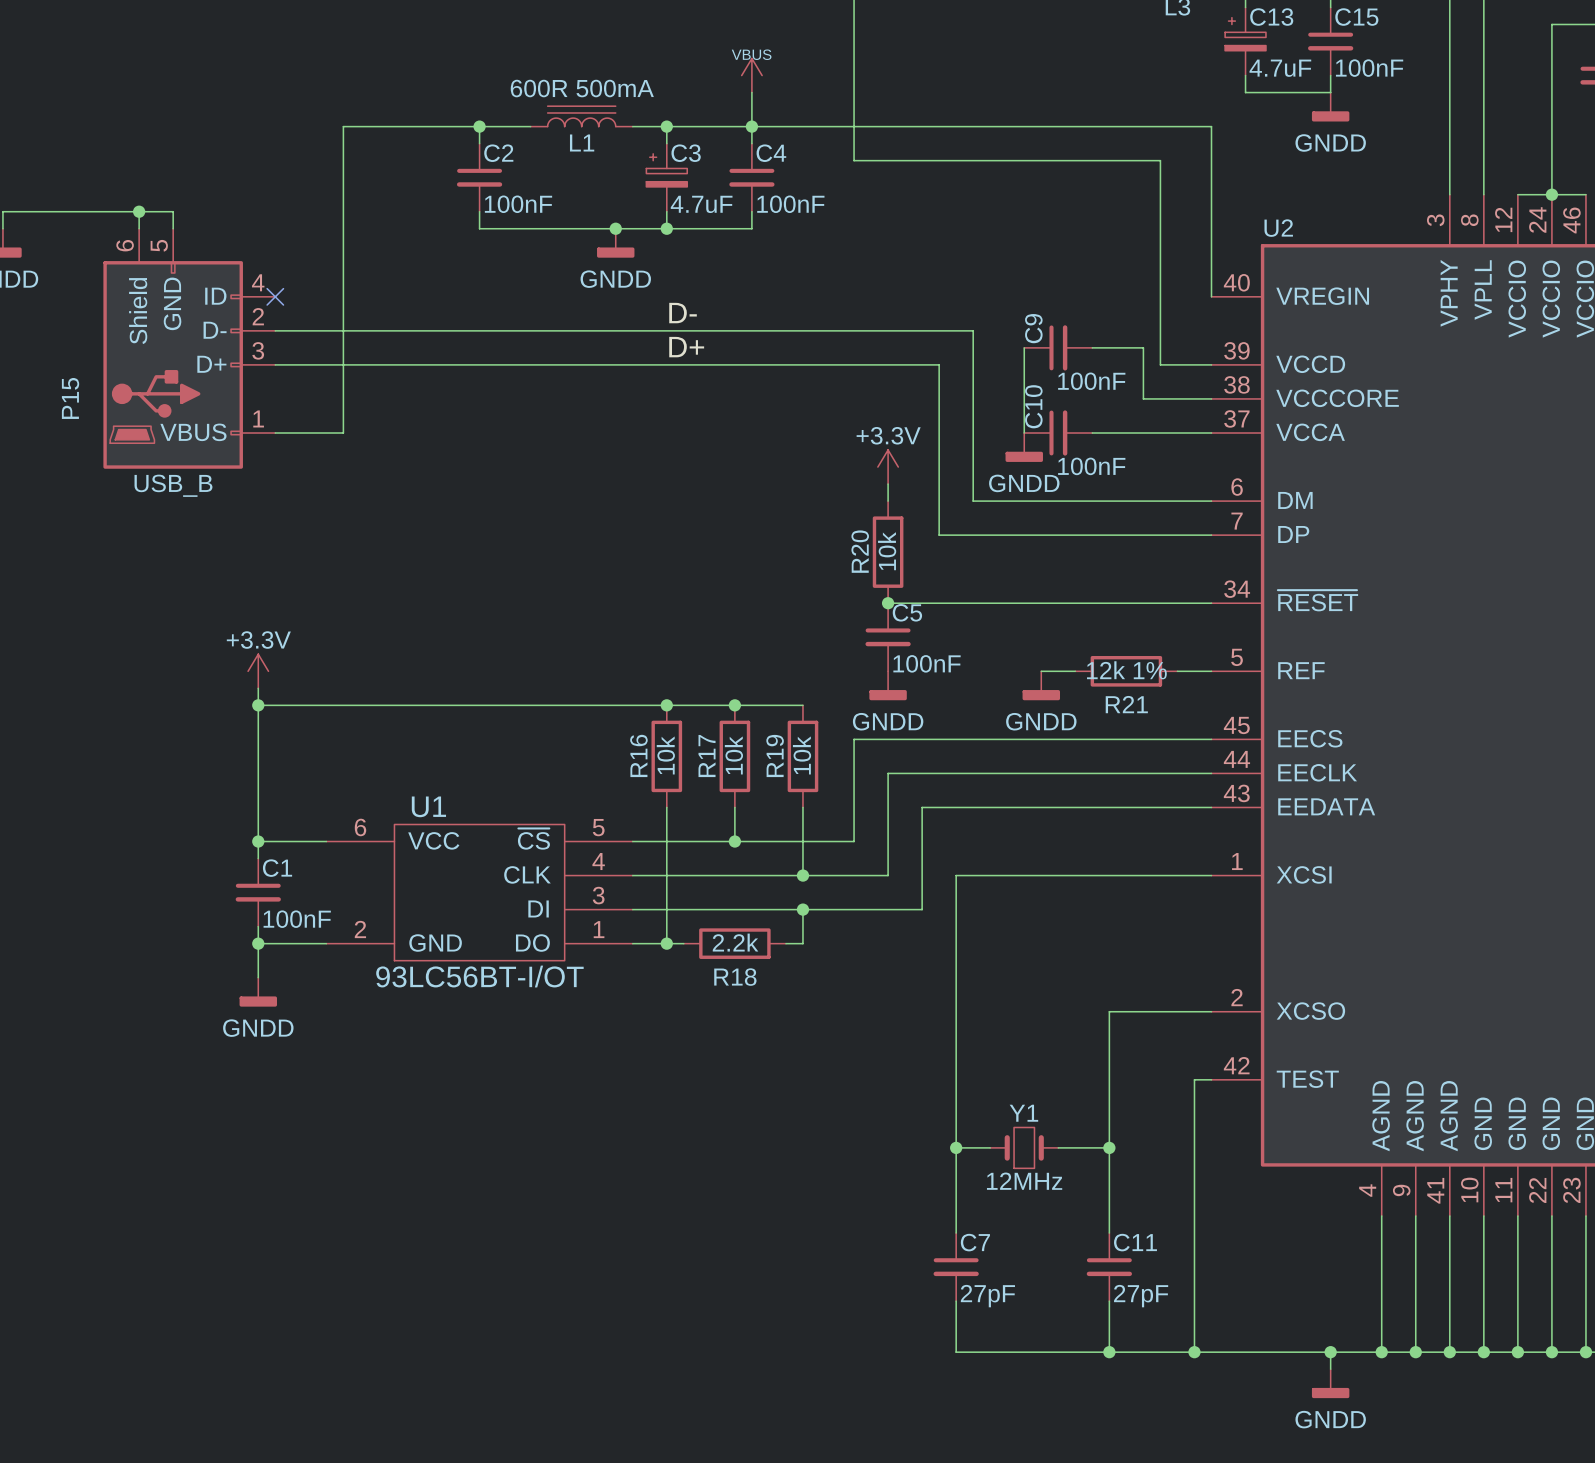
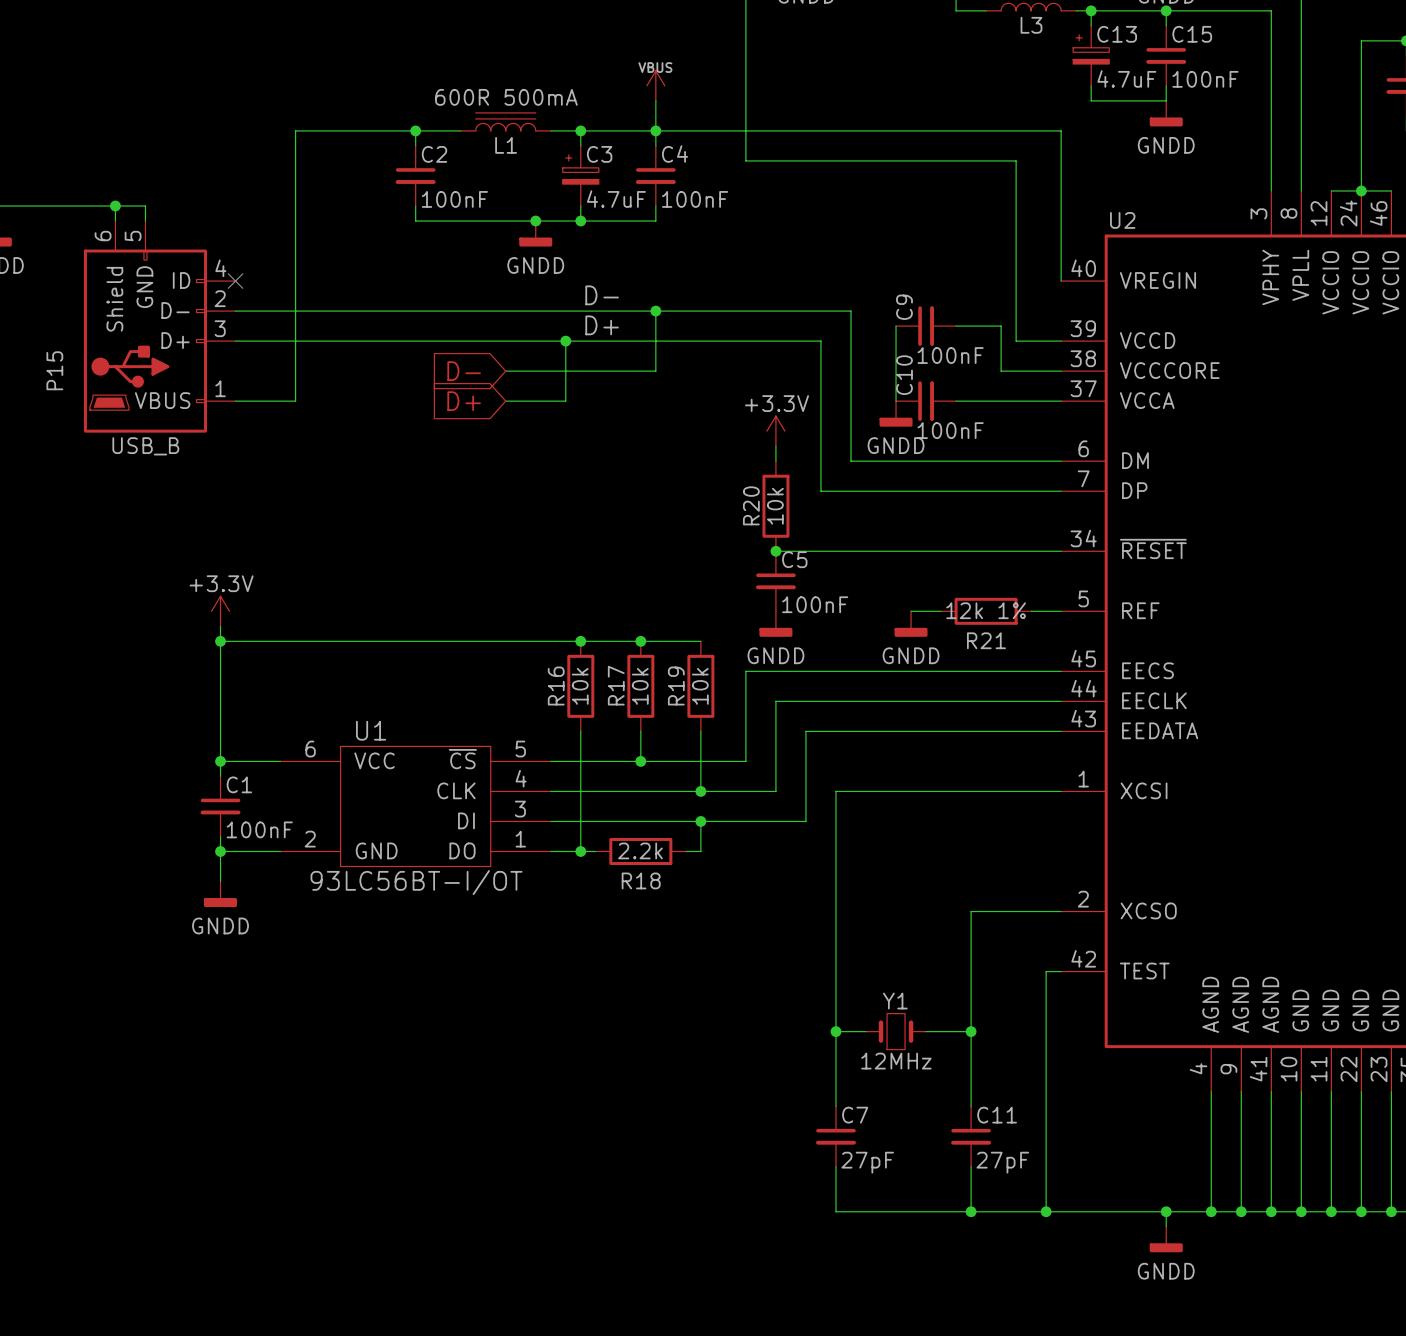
wire: none -> (655, 311) (655, 371) (505, 371)
junction: none -> (655, 311)
wire: none -> (565, 341) (565, 401) (505, 401)
junction: none -> (565, 341)
global label: none -> D- (464, 371)
global label: none -> D+ (464, 401)

